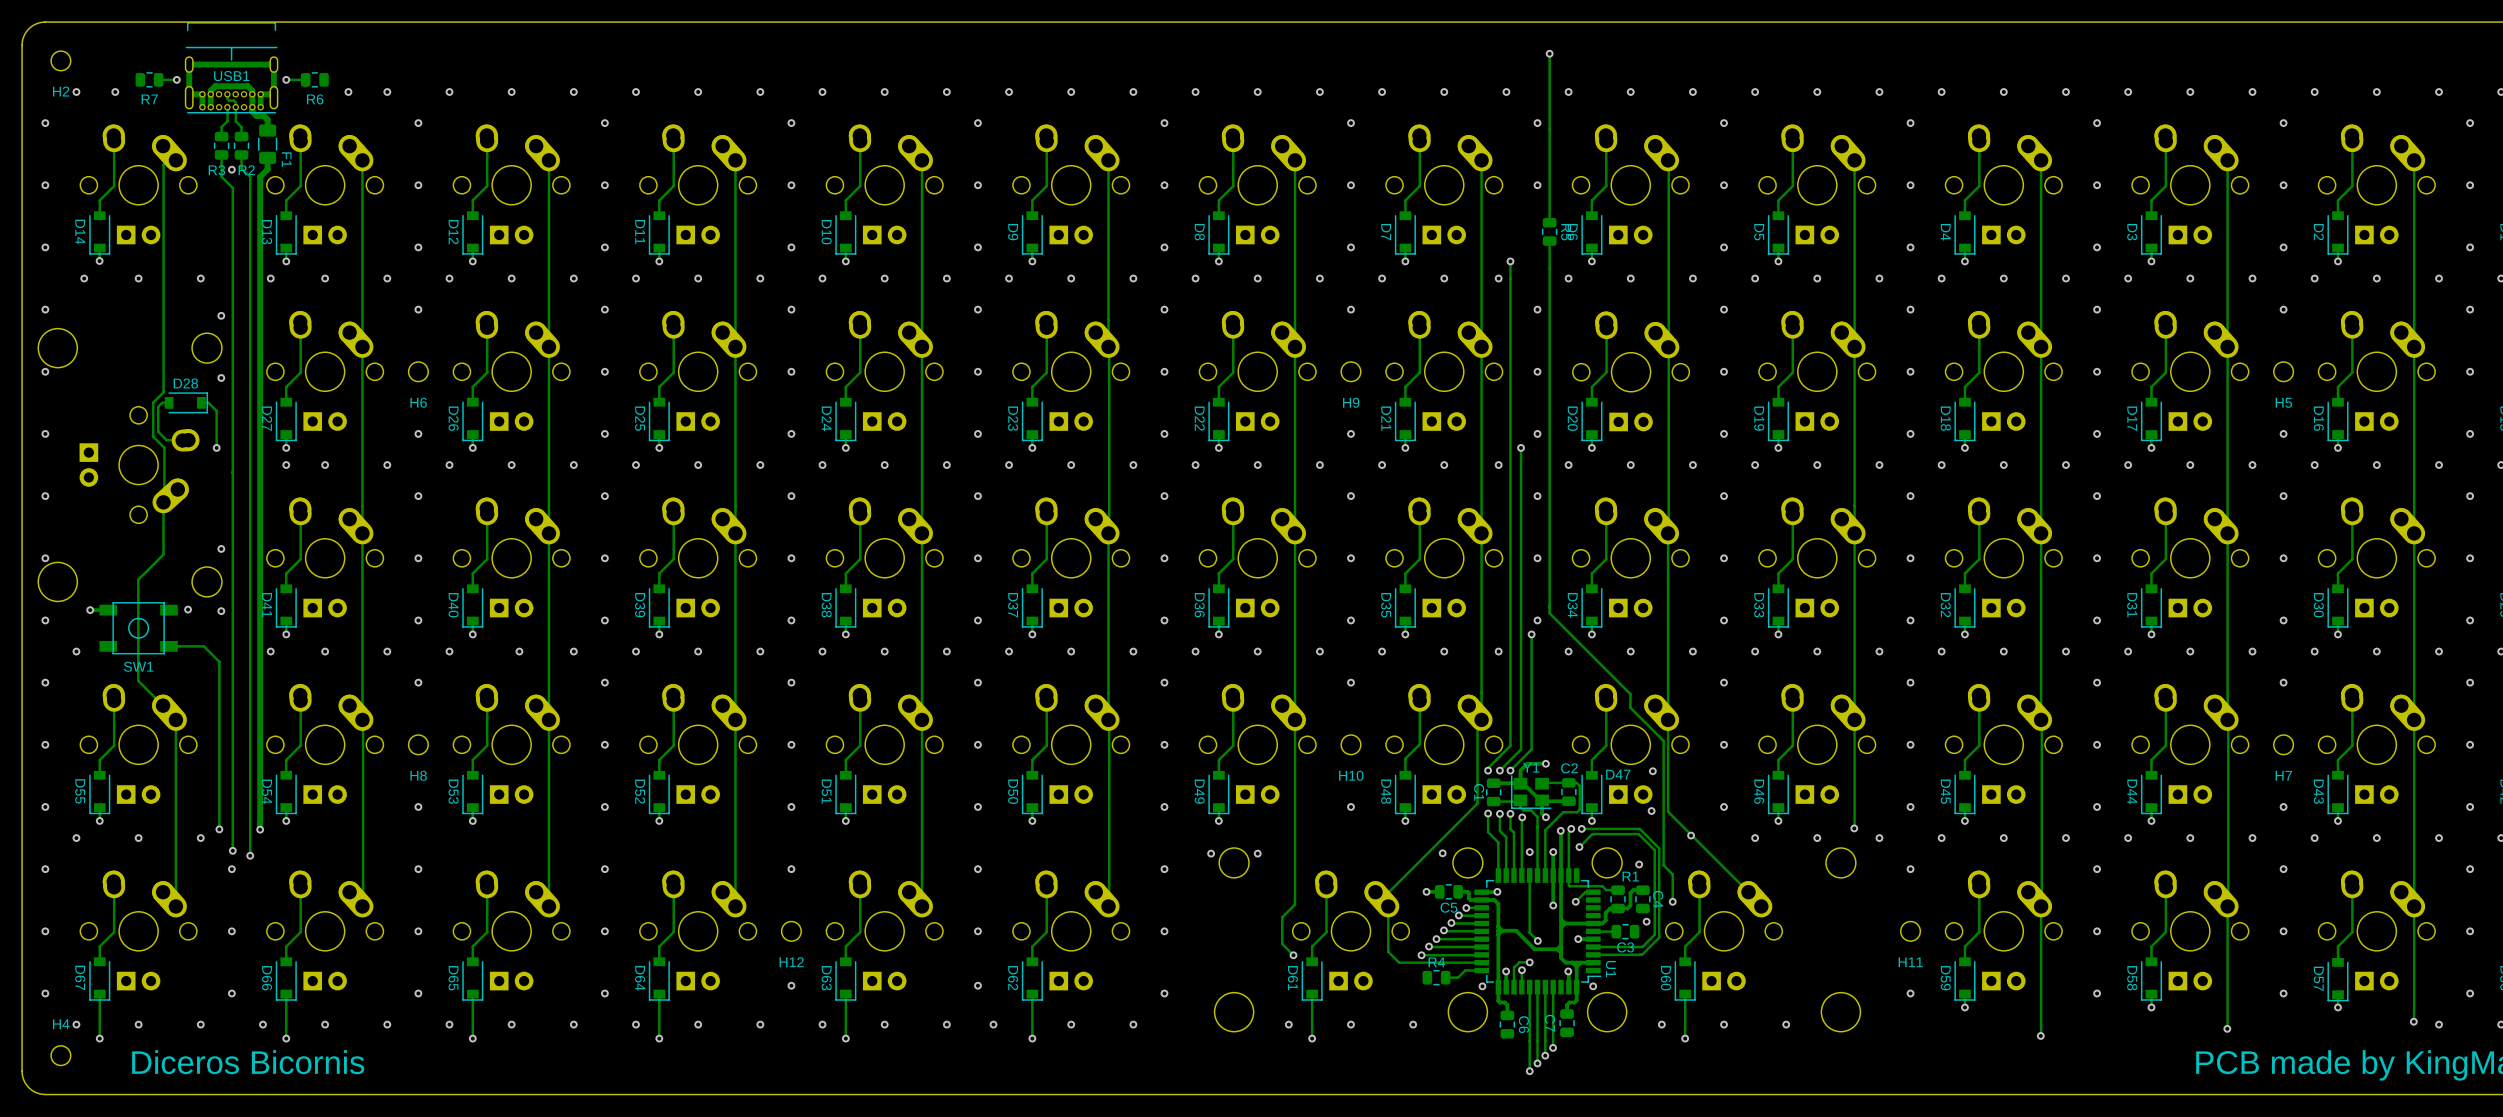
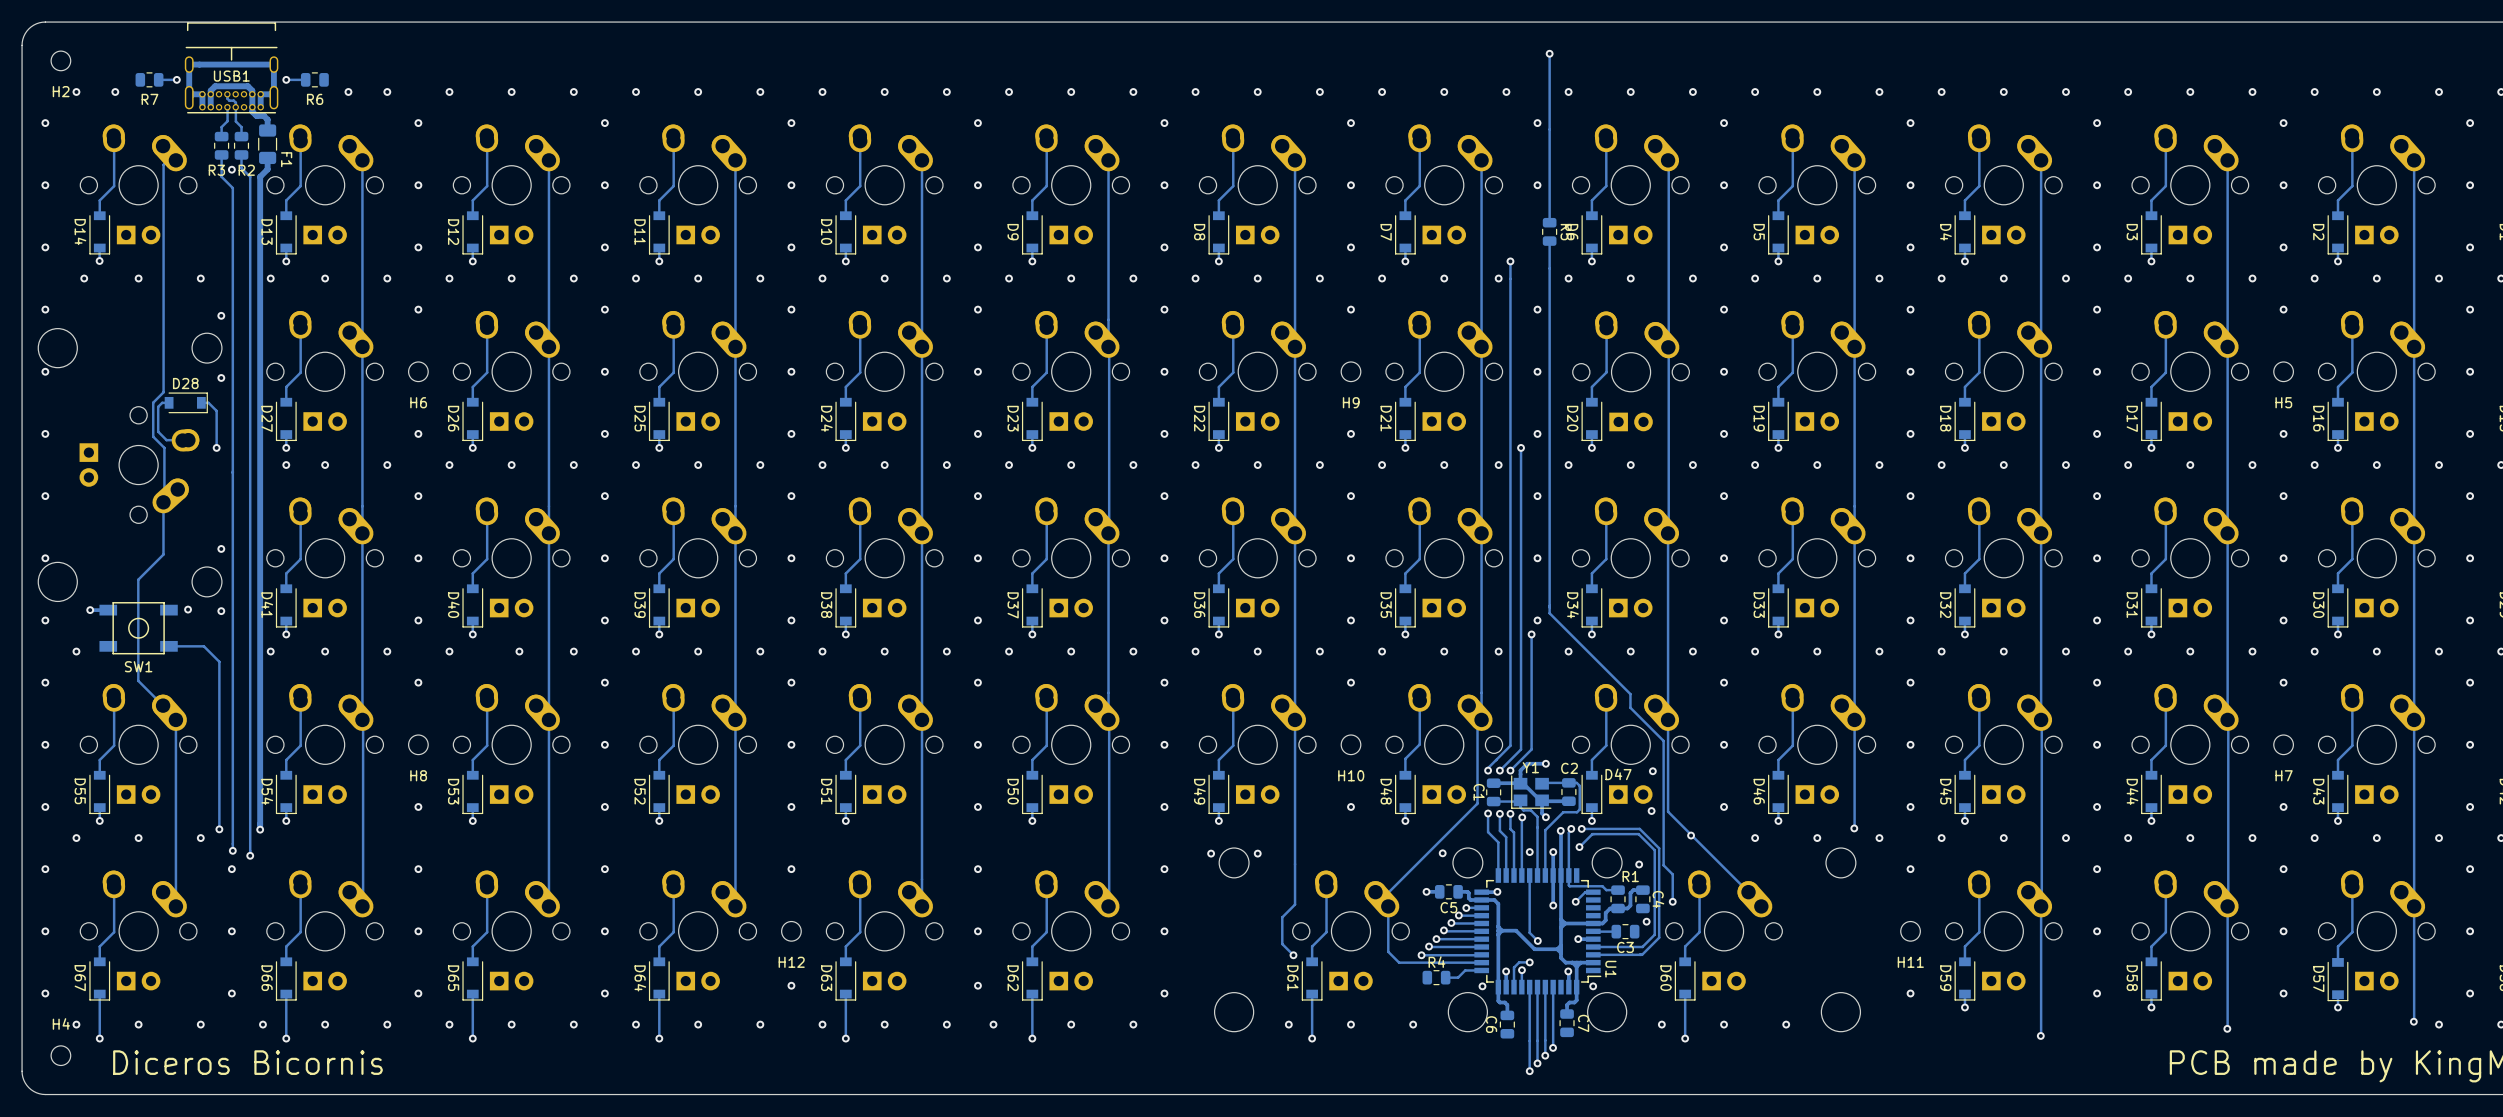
C7 name position: C7 (1550, 1023) -> C7 (1583, 1023)
C6 name position: C6 (1523, 1024) -> C6 (1491, 1024)

